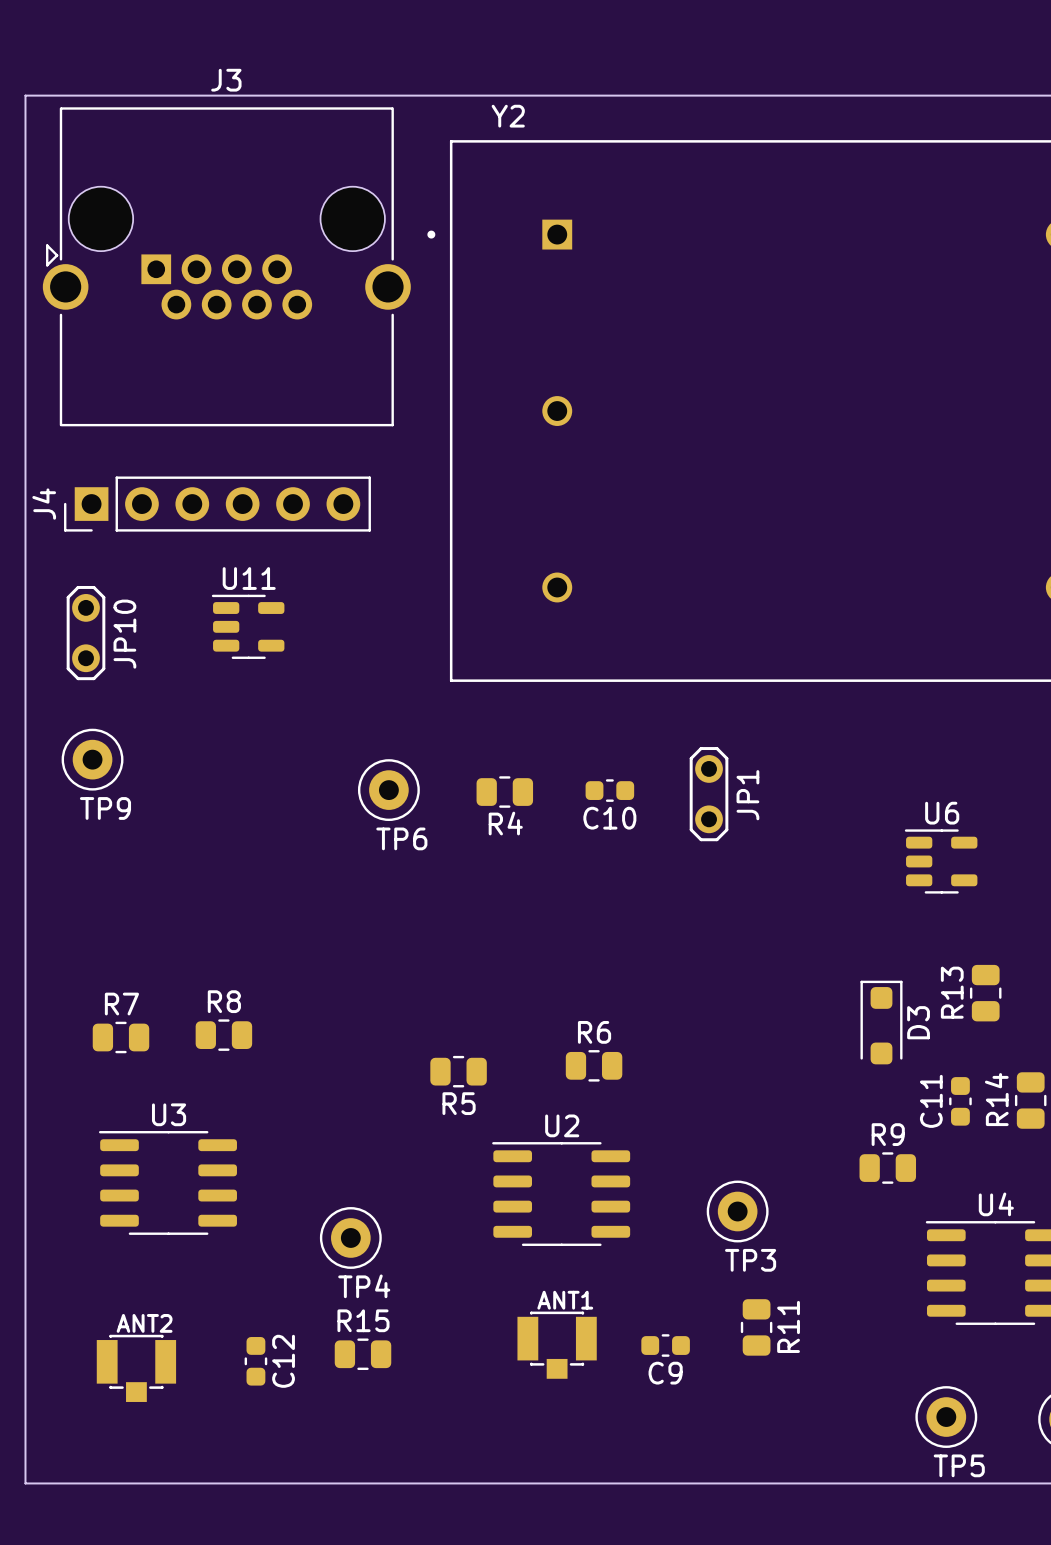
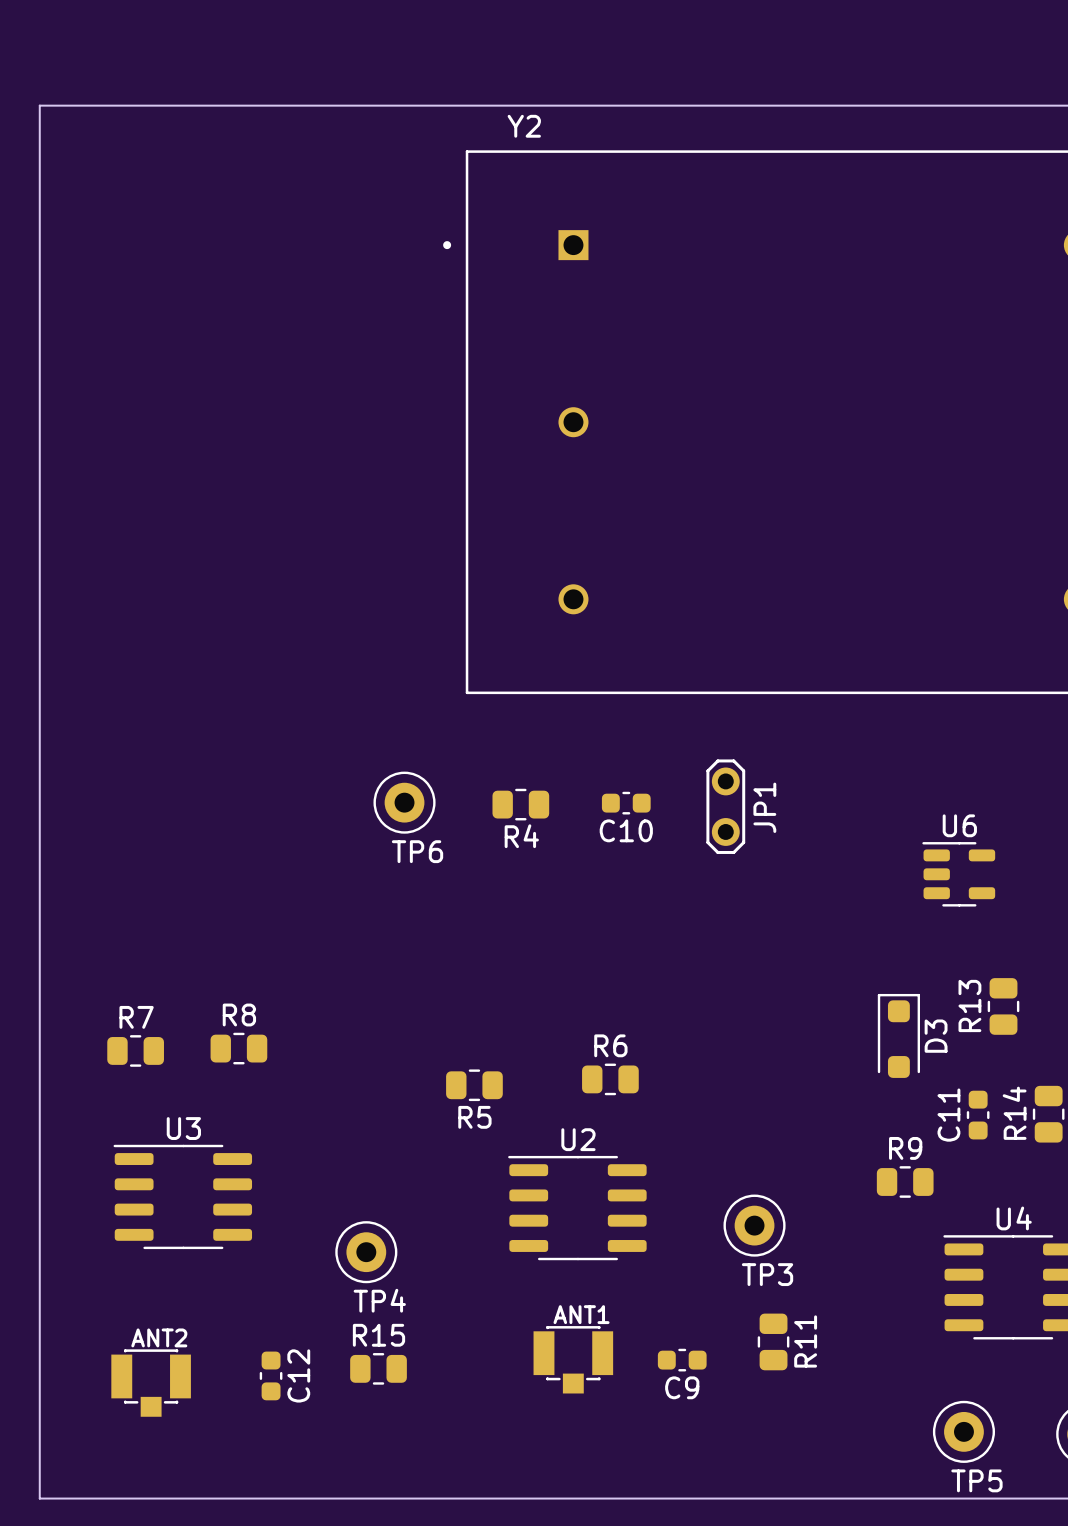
J3: (226, 266) -> none
J4: (217, 504) -> none
U11: (248, 626) -> none
JP10: (85, 633) -> none
TP9: (92, 759) -> none

